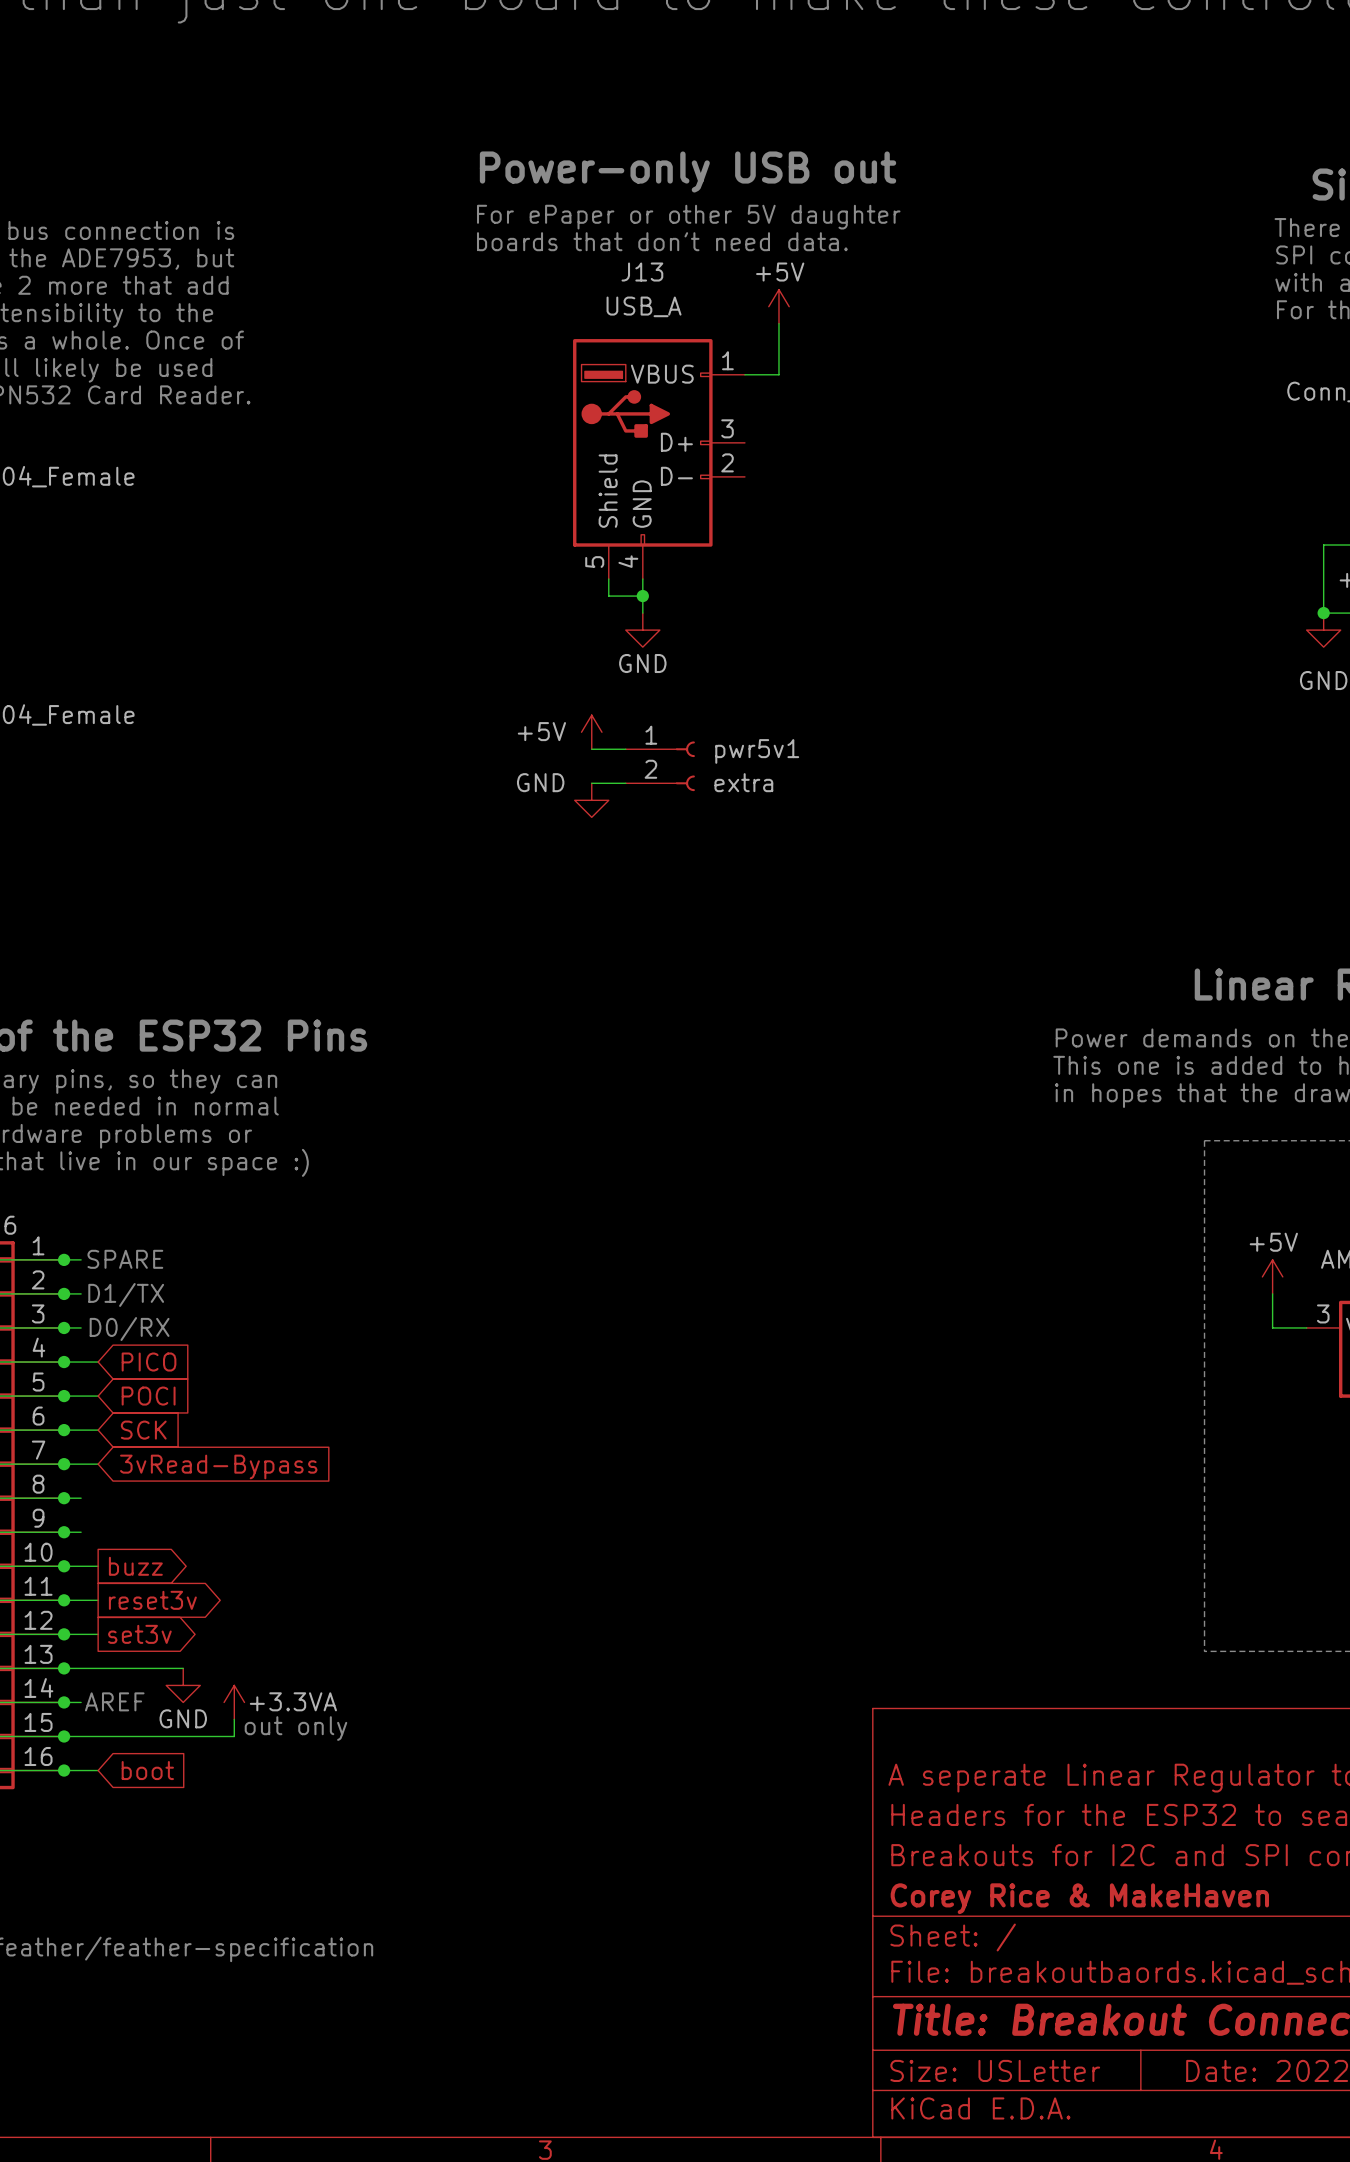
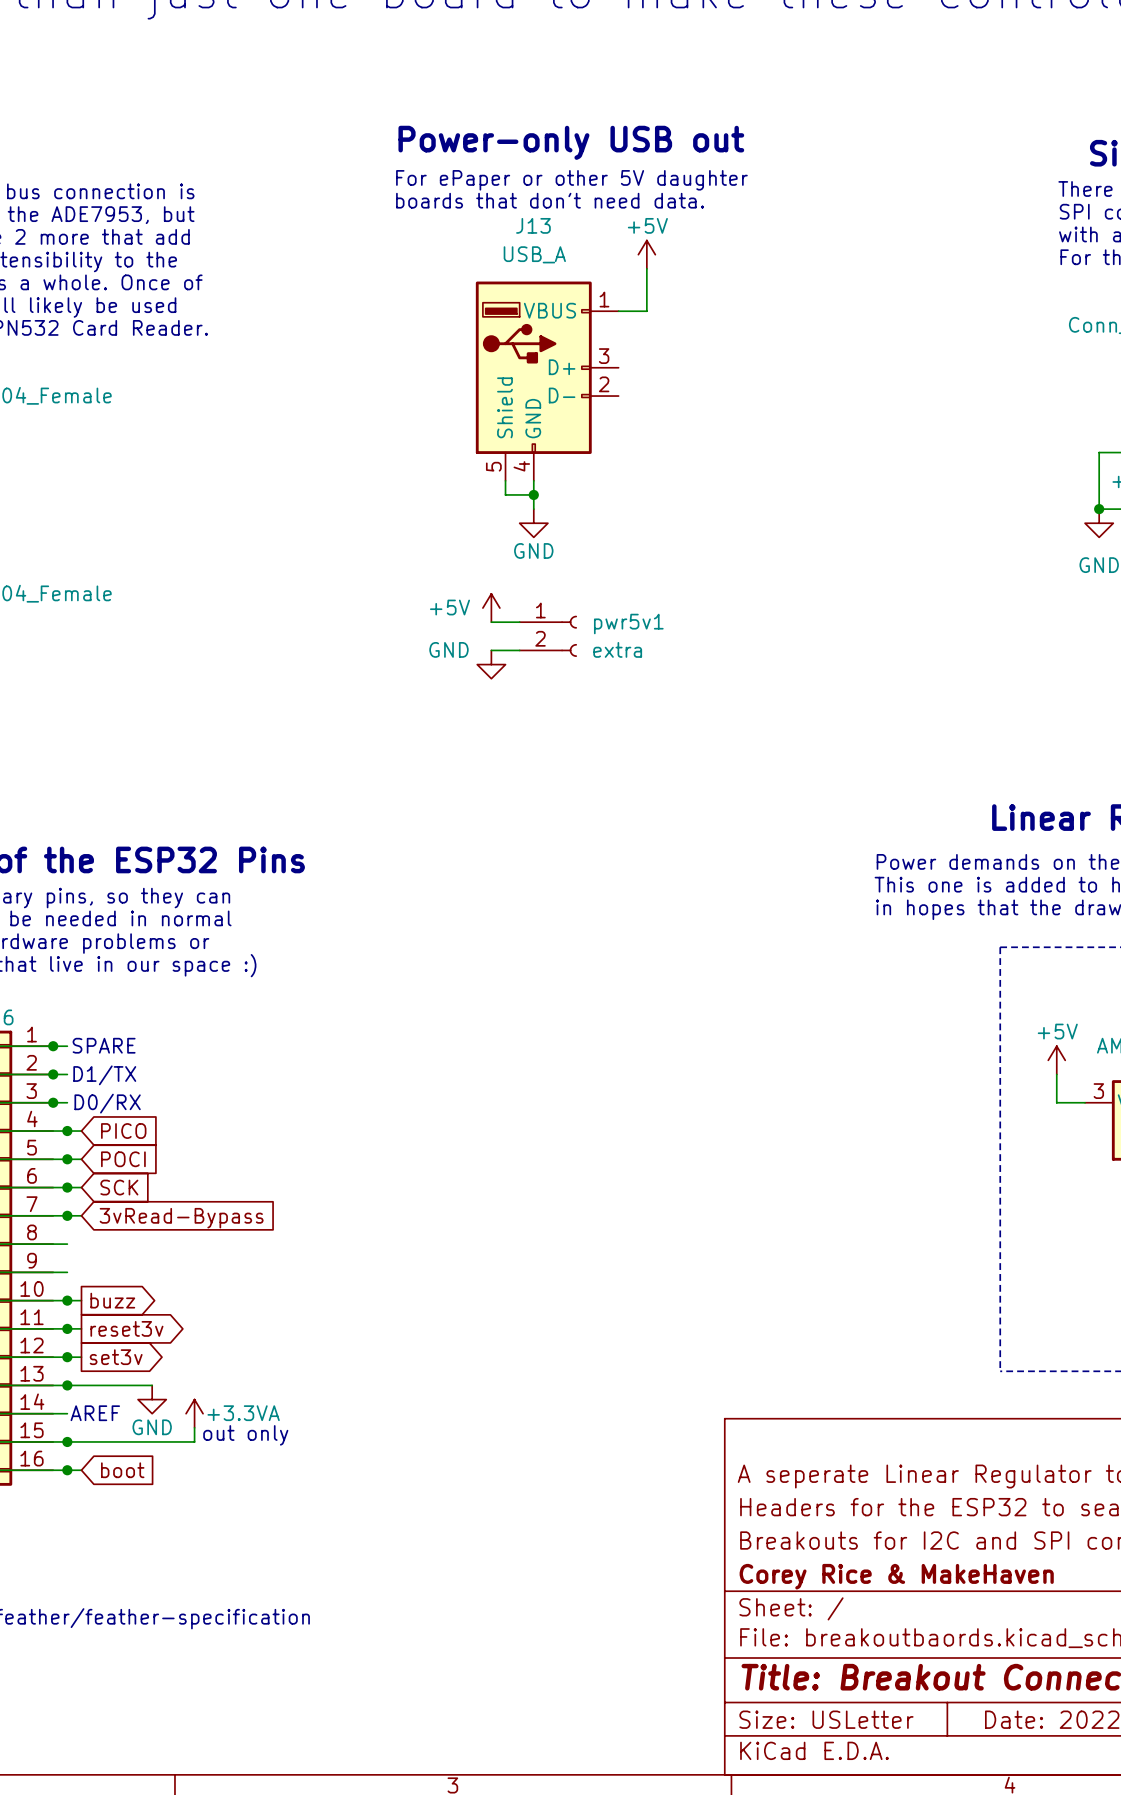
junction position: (64, 1362) -> (67, 1131)
junction position: (64, 1396) -> (67, 1159)
junction position: (64, 1430) -> (67, 1187)
junction position: (64, 1464) -> (67, 1215)
junction: (64, 1498) -> none
junction: (64, 1532) -> none
junction position: (64, 1566) -> (67, 1300)
junction position: (64, 1600) -> (67, 1328)
junction position: (64, 1634) -> (67, 1357)
junction position: (64, 1668) -> (67, 1385)
junction: (64, 1702) -> none
junction position: (64, 1736) -> (67, 1441)
junction position: (64, 1770) -> (67, 1470)

